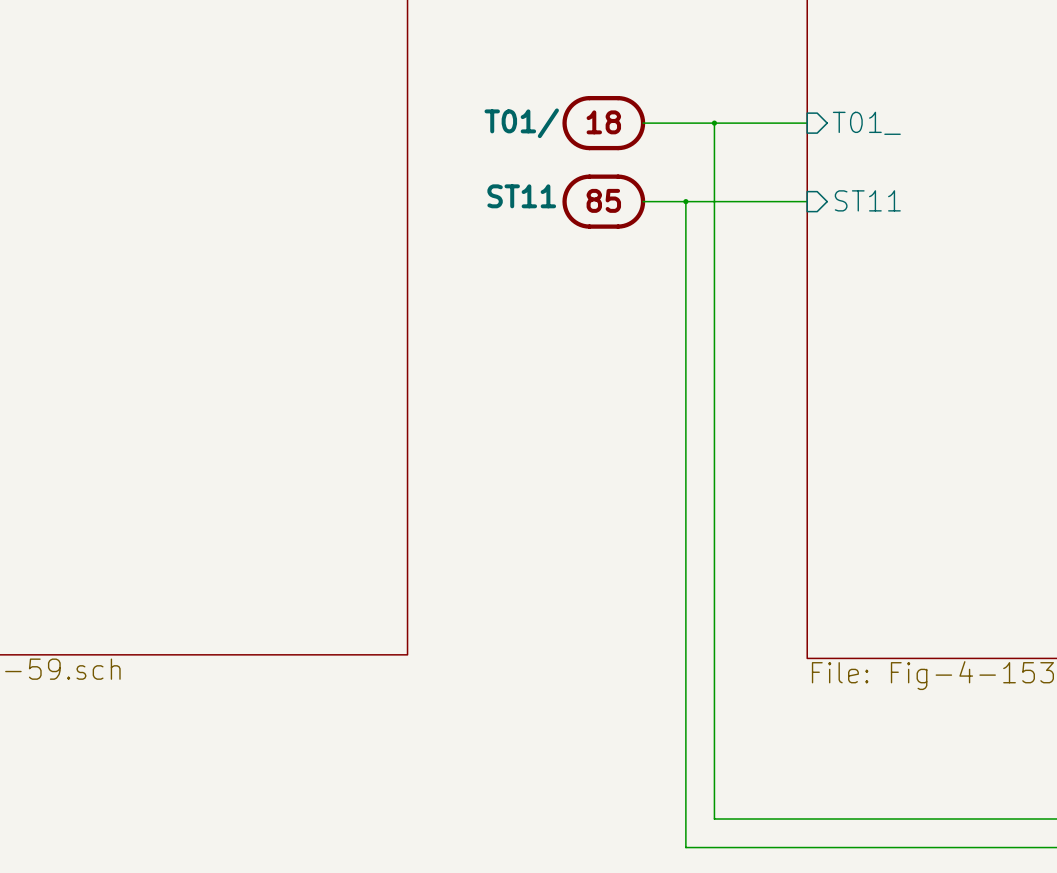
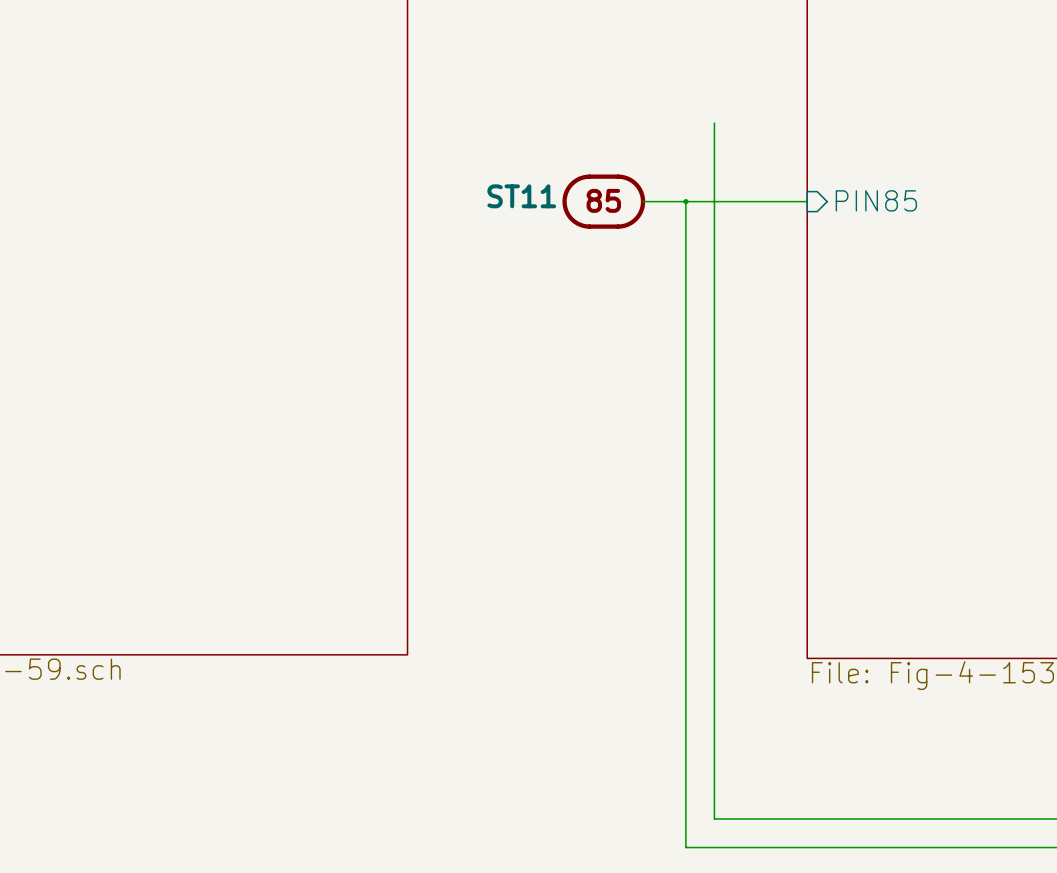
part: (603, 123) -> none
wire: (643, 123) (807, 123) -> none
junction: (714, 123) -> none
sheet pin: T01_ (866, 123) -> none
sheet pin: ST11 (867, 200) -> PIN85 (876, 200)

